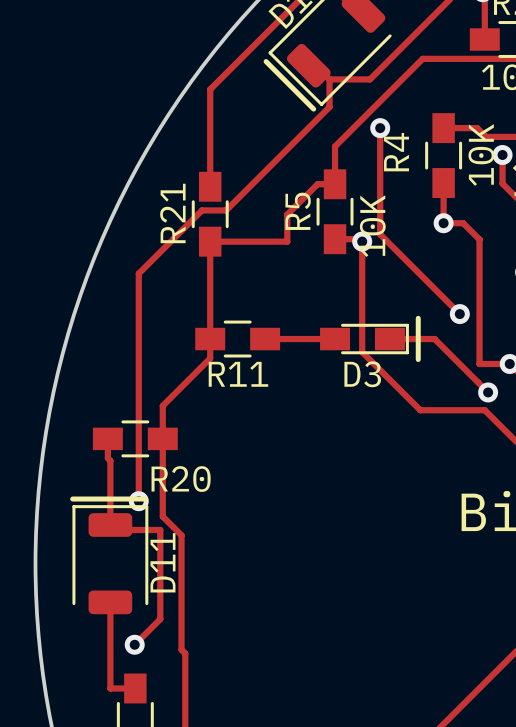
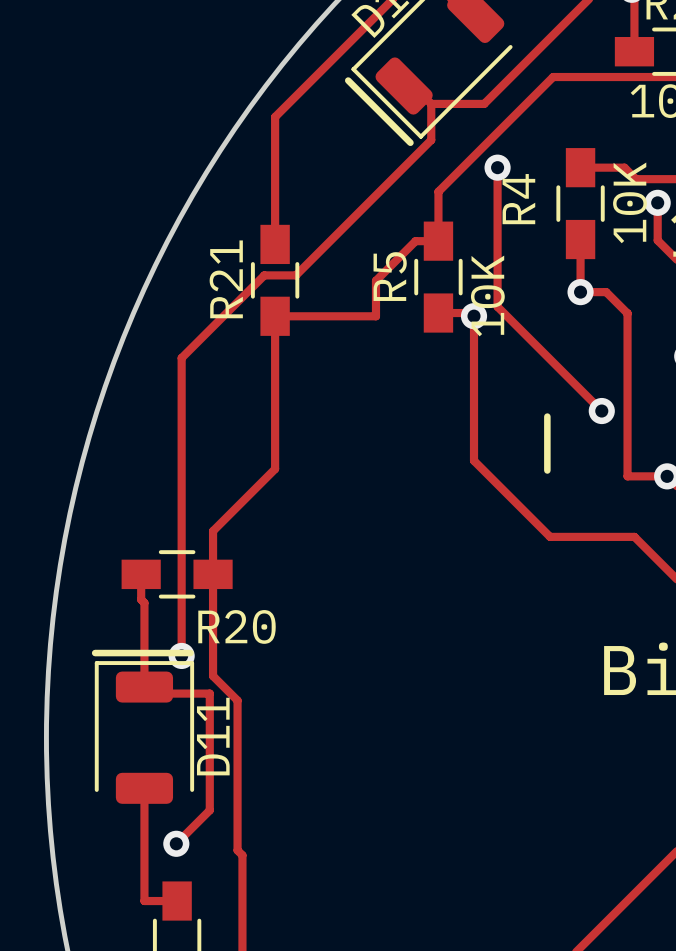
R11: (237, 339) -> none
track: (265, 339) (335, 339) -> none
D3: (364, 339) -> none
track: (389, 339) (434, 339) (488, 392) -> none
via: (488, 392) -> none

